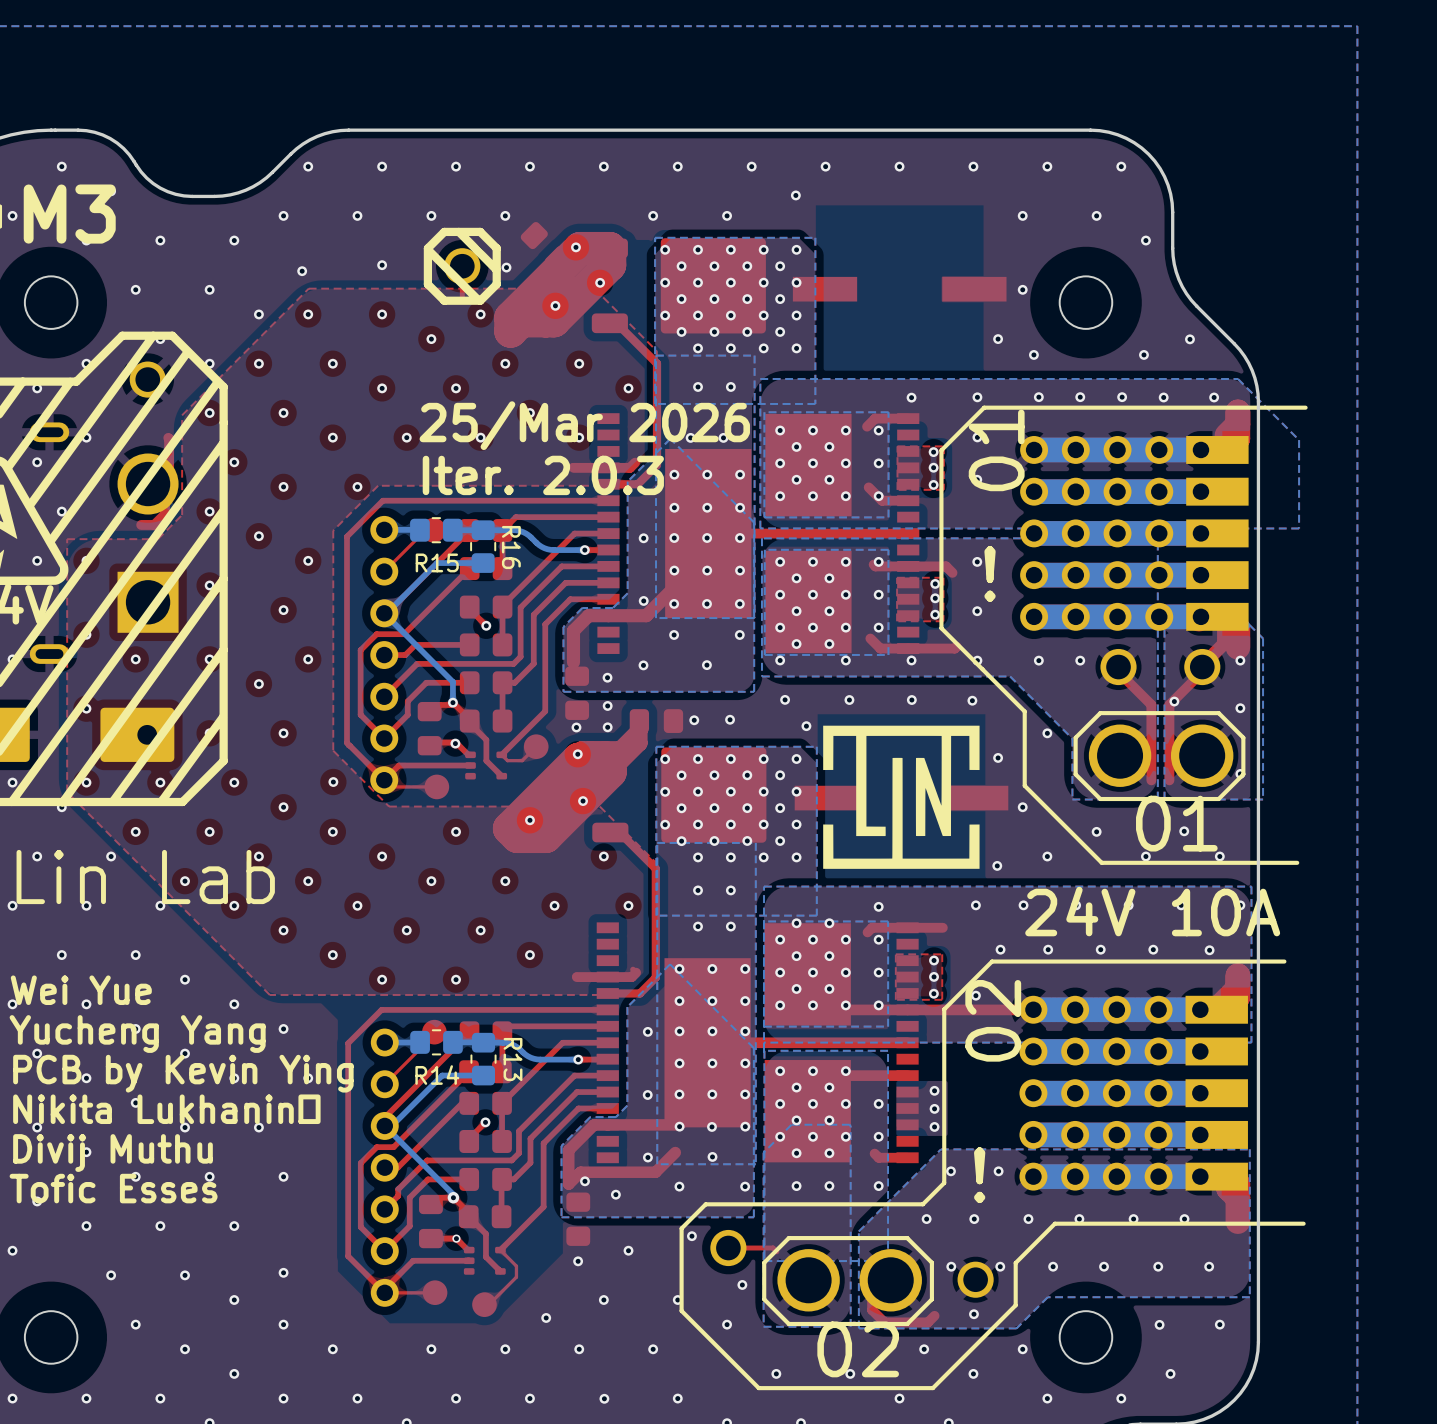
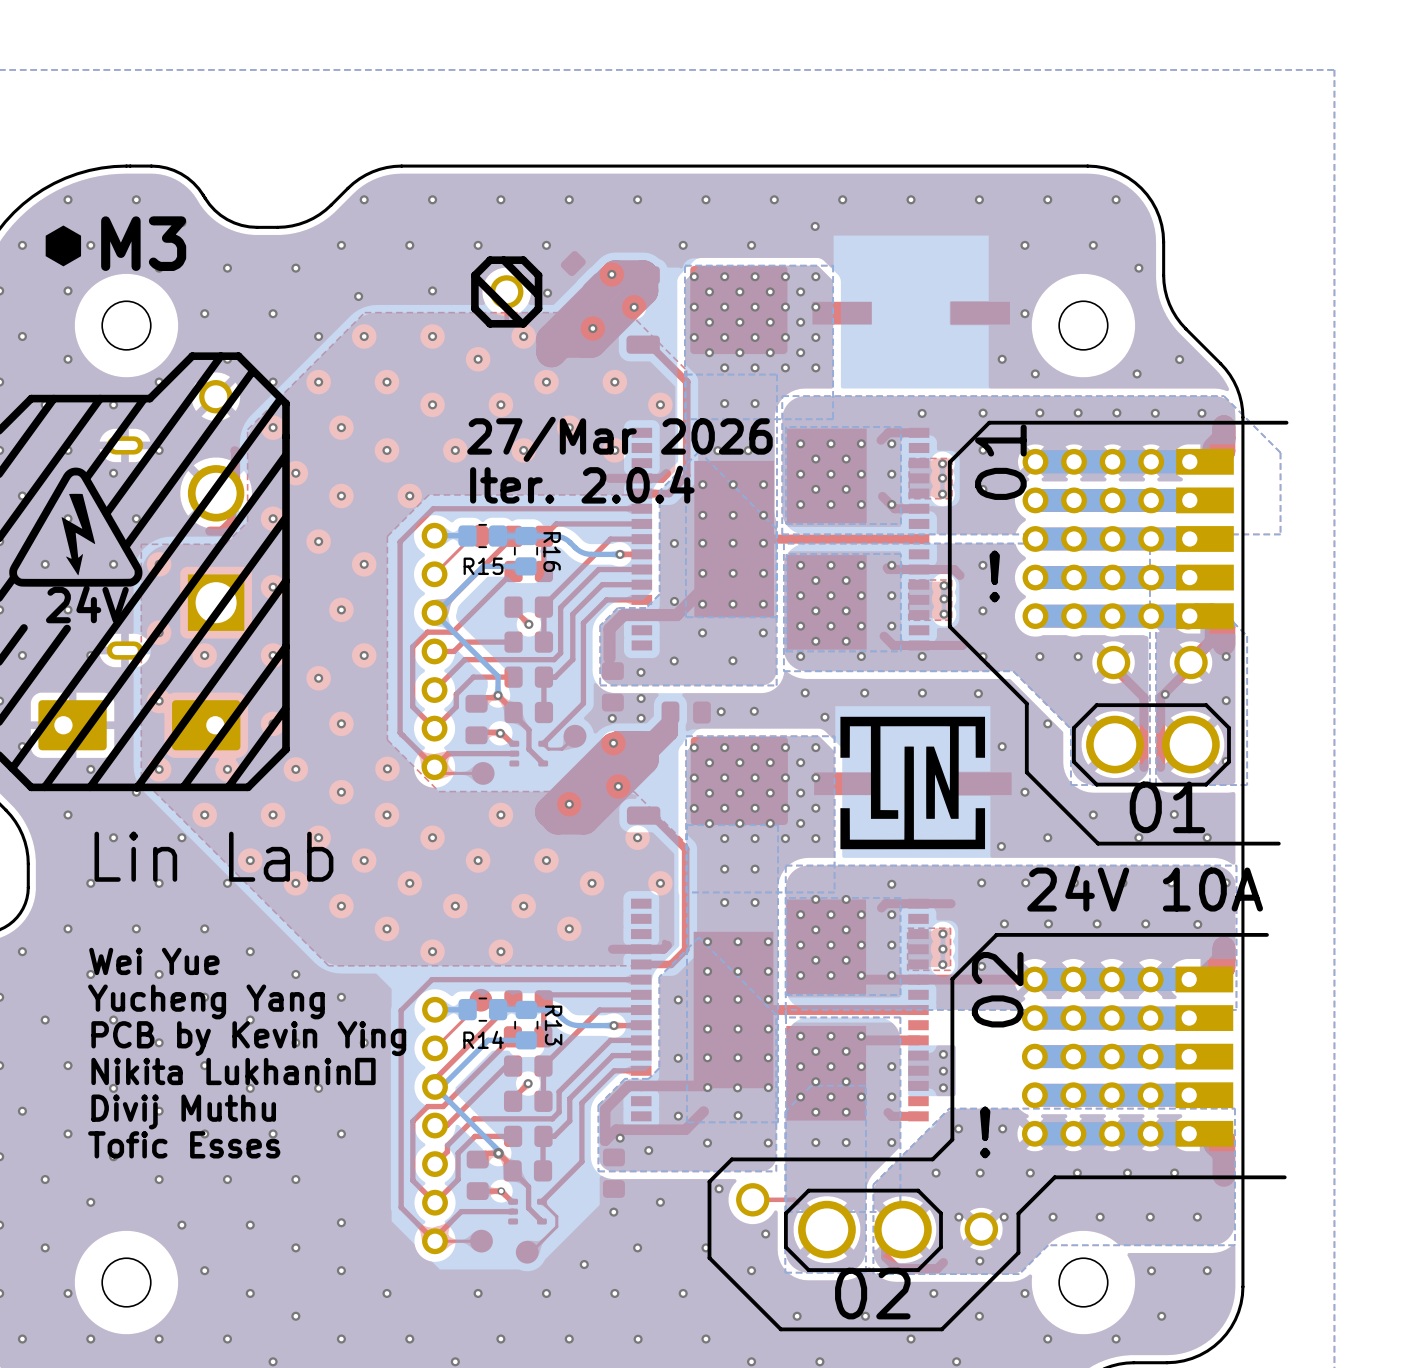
text: 25/Mar 2026 (584, 425) -> 27/Mar 2026 (619, 439)
text: Iter. 2.0.3 (543, 475) -> Iter. 2.0.4 (582, 484)

